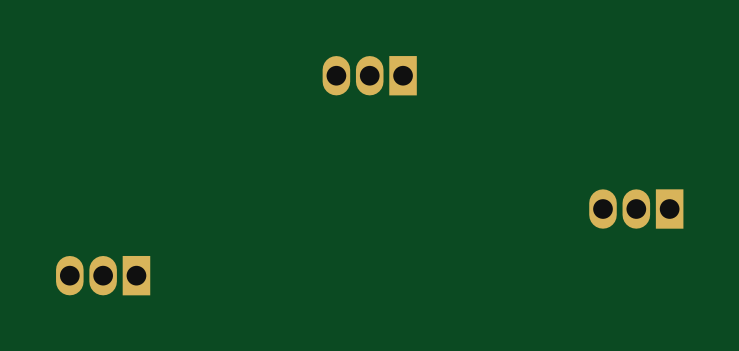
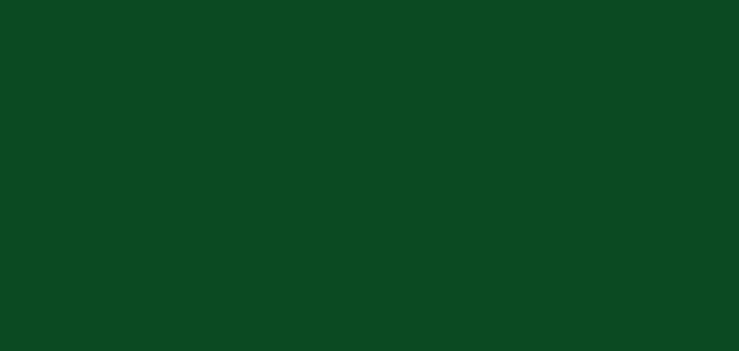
part: (369, 75) -> none
part: (636, 209) -> none
part: (103, 275) -> none

